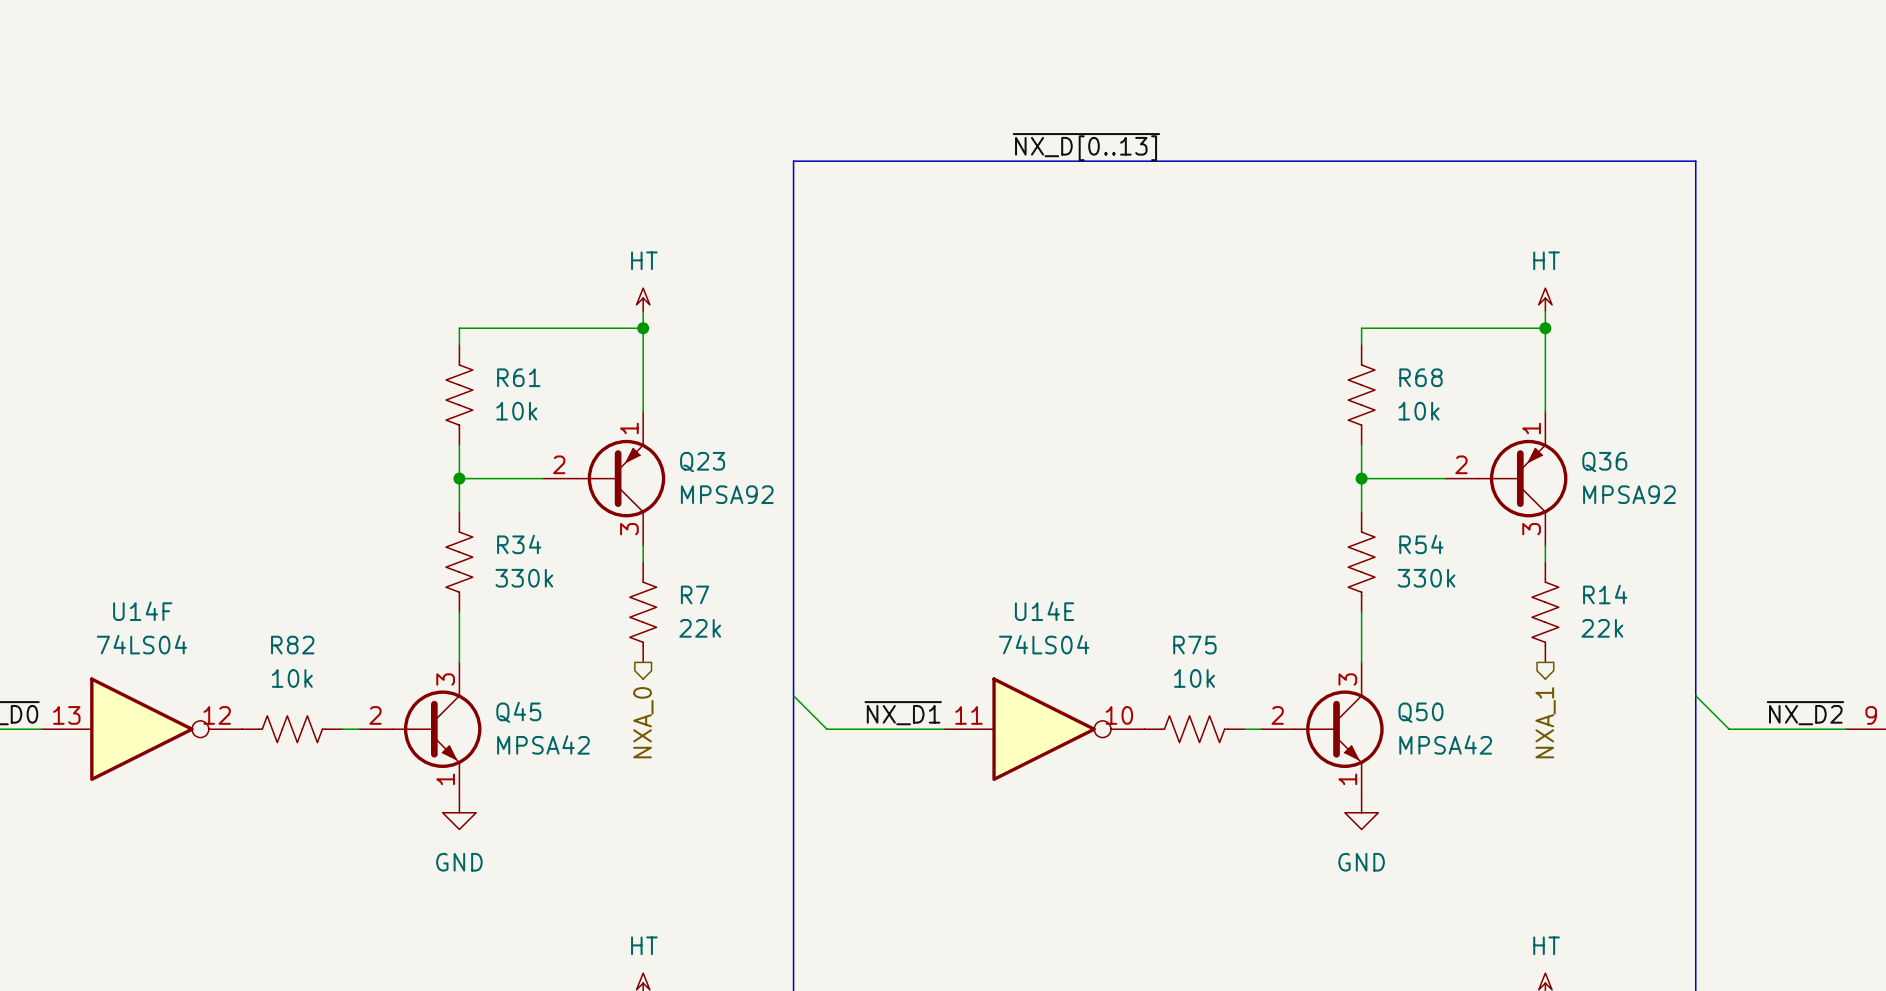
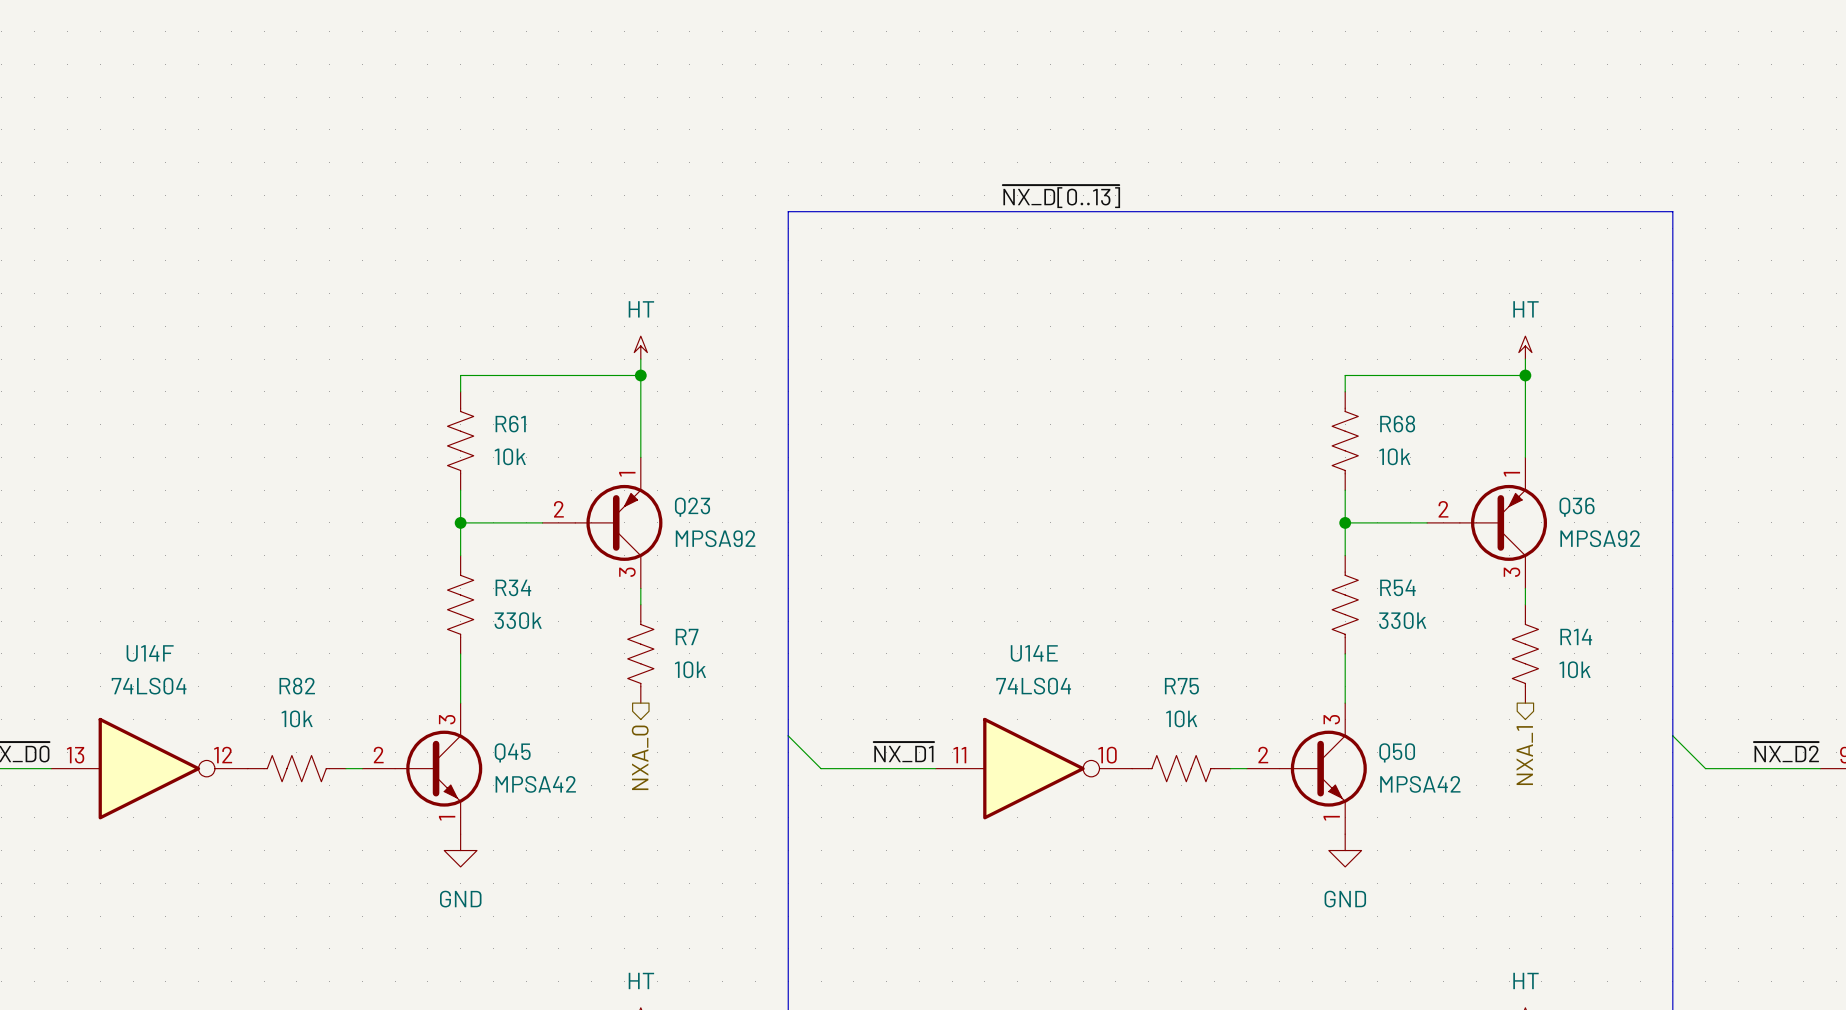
R7 value: 22k (700, 628) -> 10k (690, 669)
R14 value: 22k (1602, 628) -> 10k (1575, 669)

